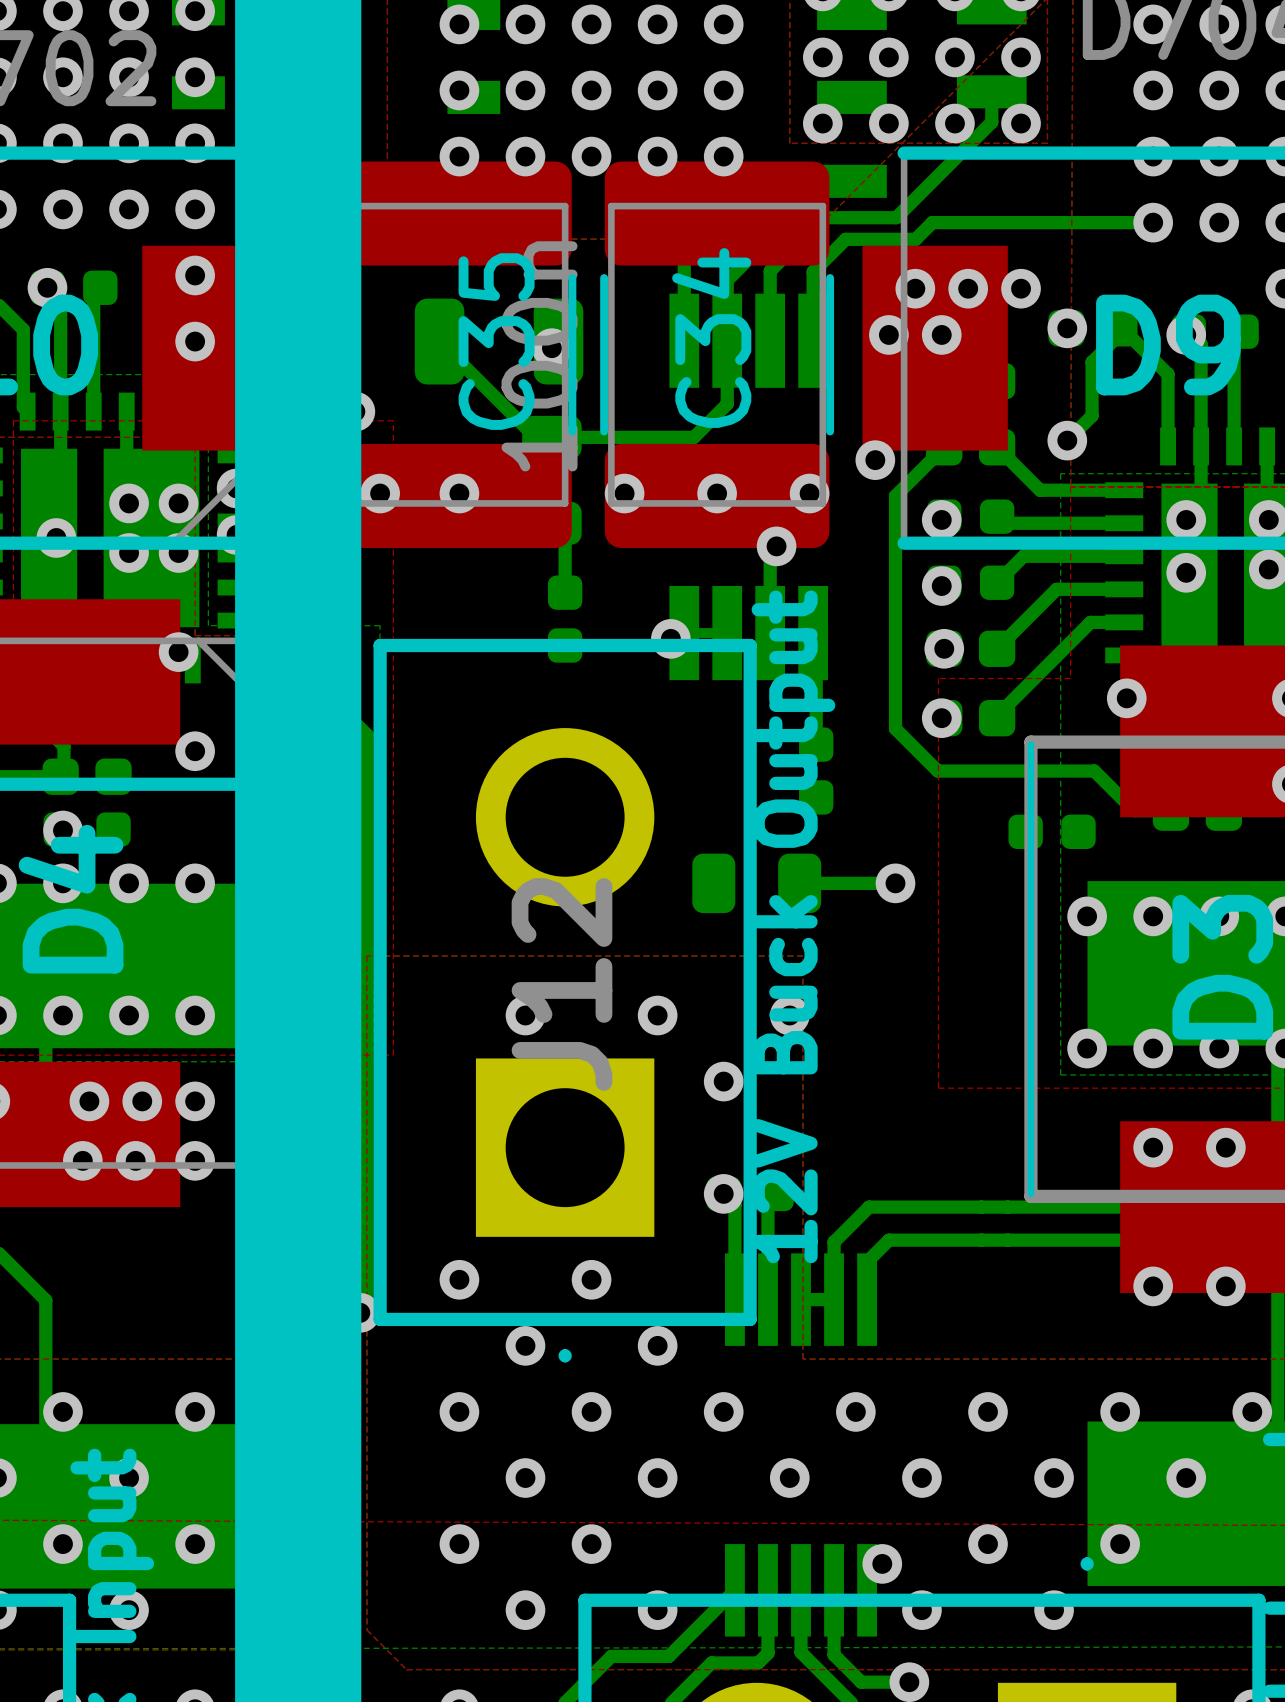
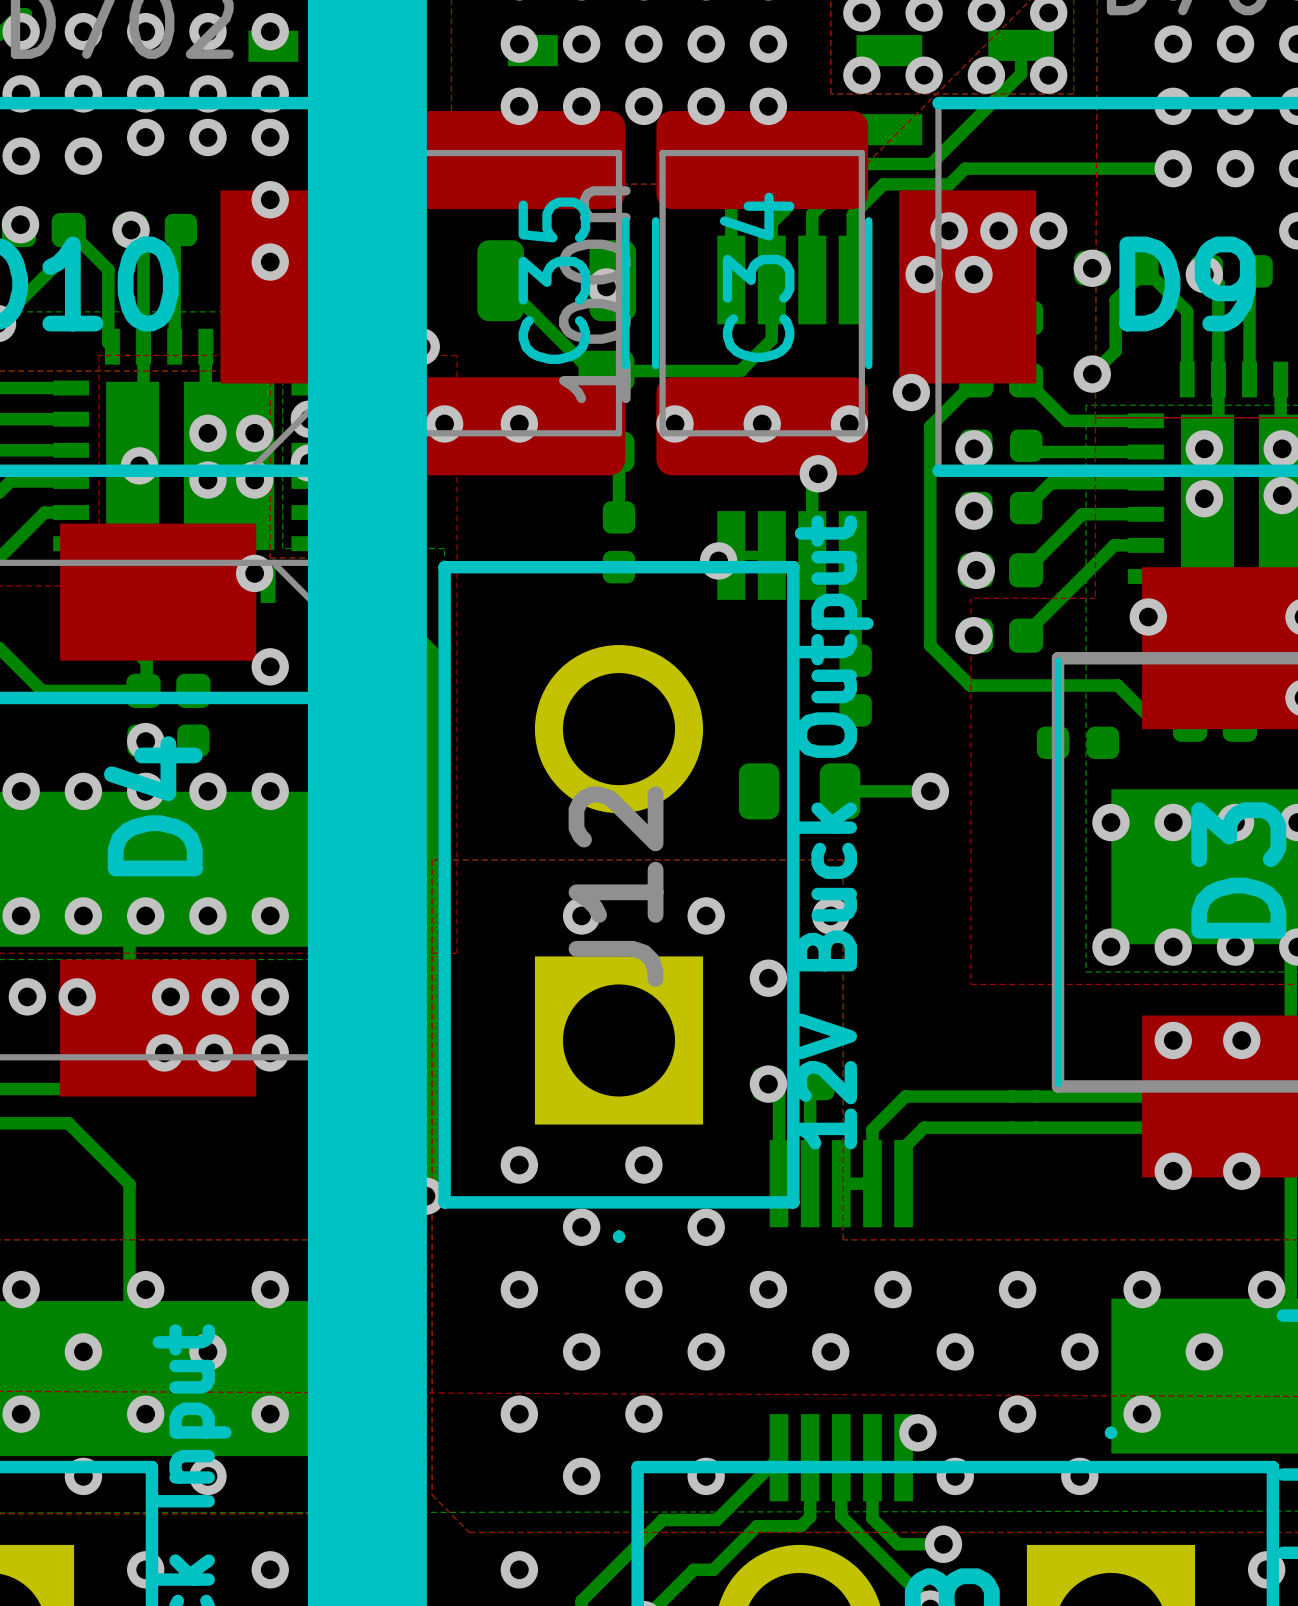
via position: (62, 209) -> (145, 137)
via position: (129, 209) -> (207, 137)
via position: (195, 209) -> (270, 137)
via position: (195, 275) -> (270, 199)
via position: (195, 341) -> (270, 262)

